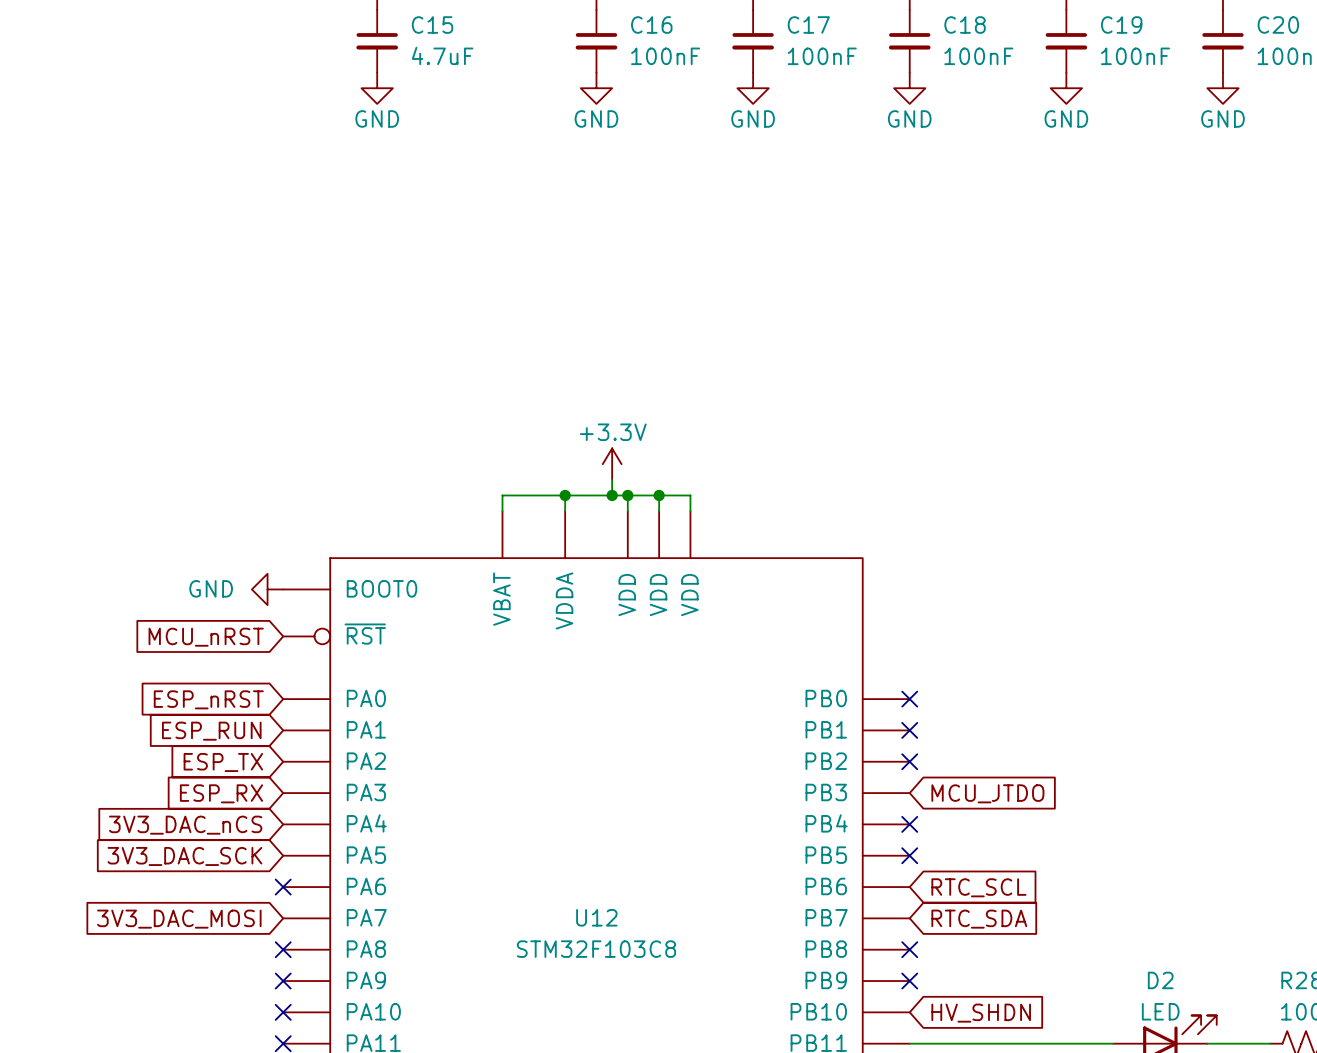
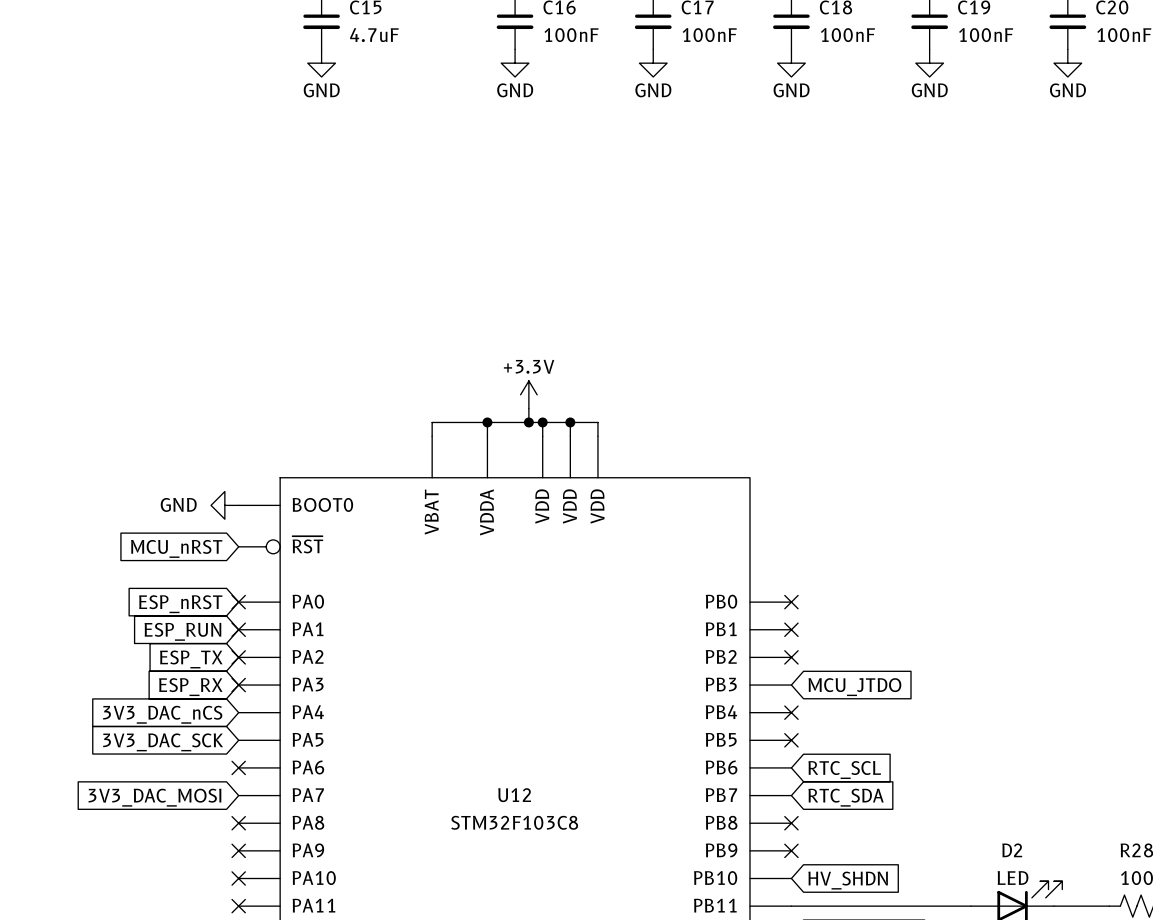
no-connect mark: none -> (238, 602)
no-connect mark: none -> (238, 629)
no-connect mark: none -> (238, 657)
no-connect mark: none -> (238, 685)

